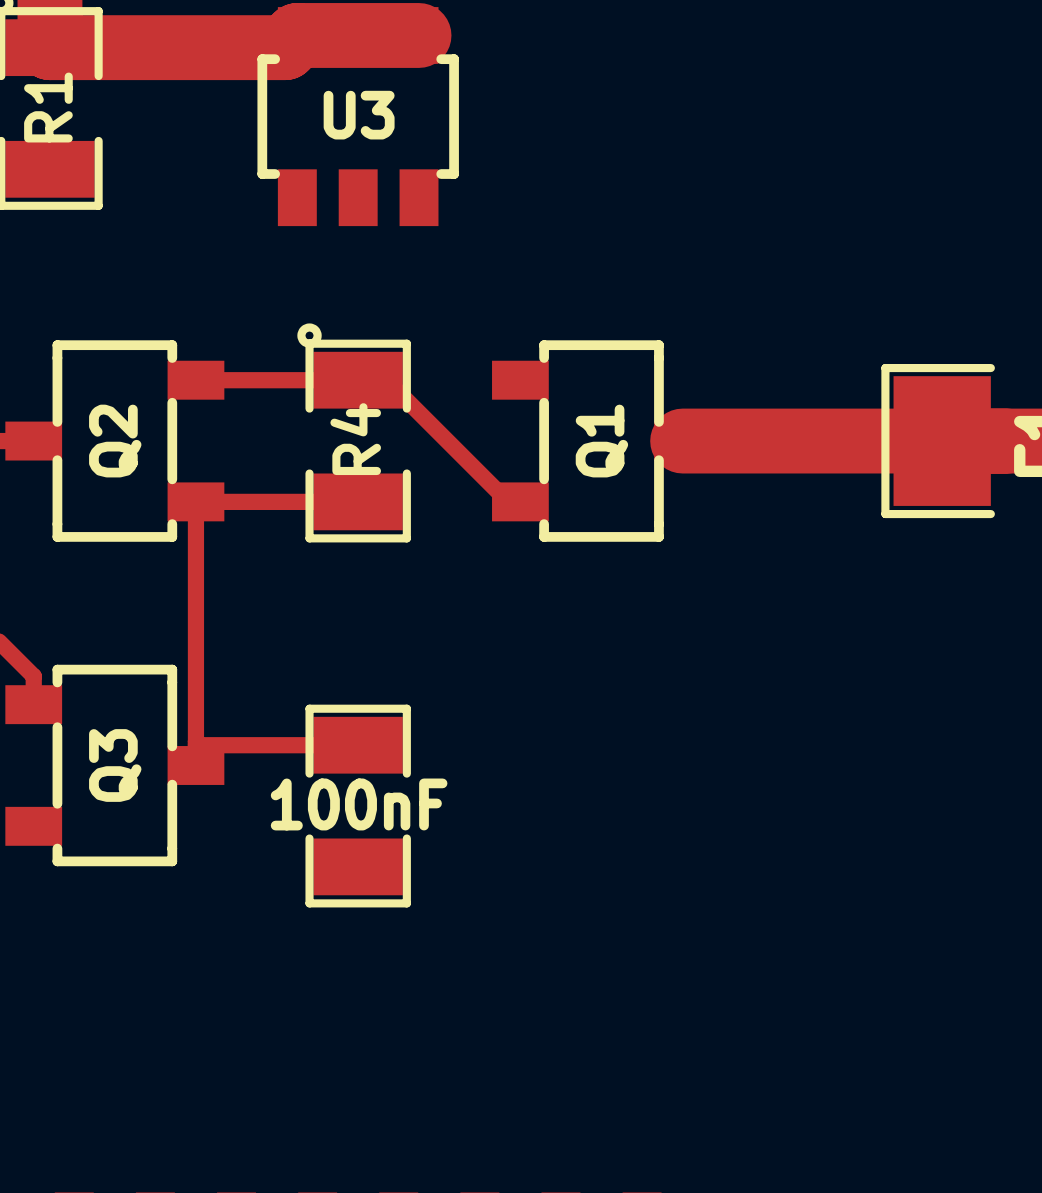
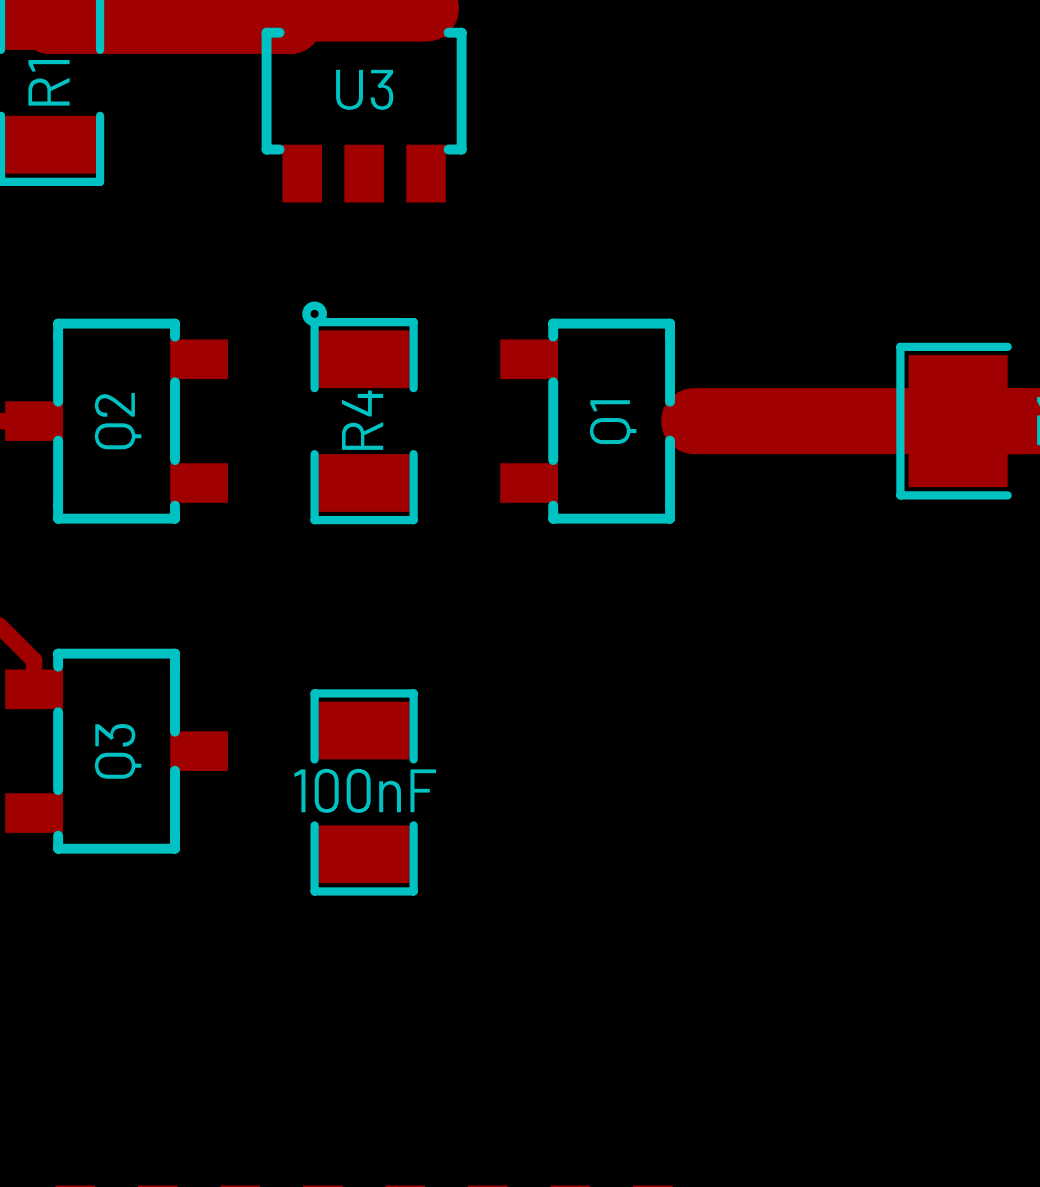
track: (195, 380) (386, 380) (508, 501) (520, 501) -> none
track: (358, 501) (195, 501) (195, 765) -> none
track: (195, 745) (358, 745) -> none

